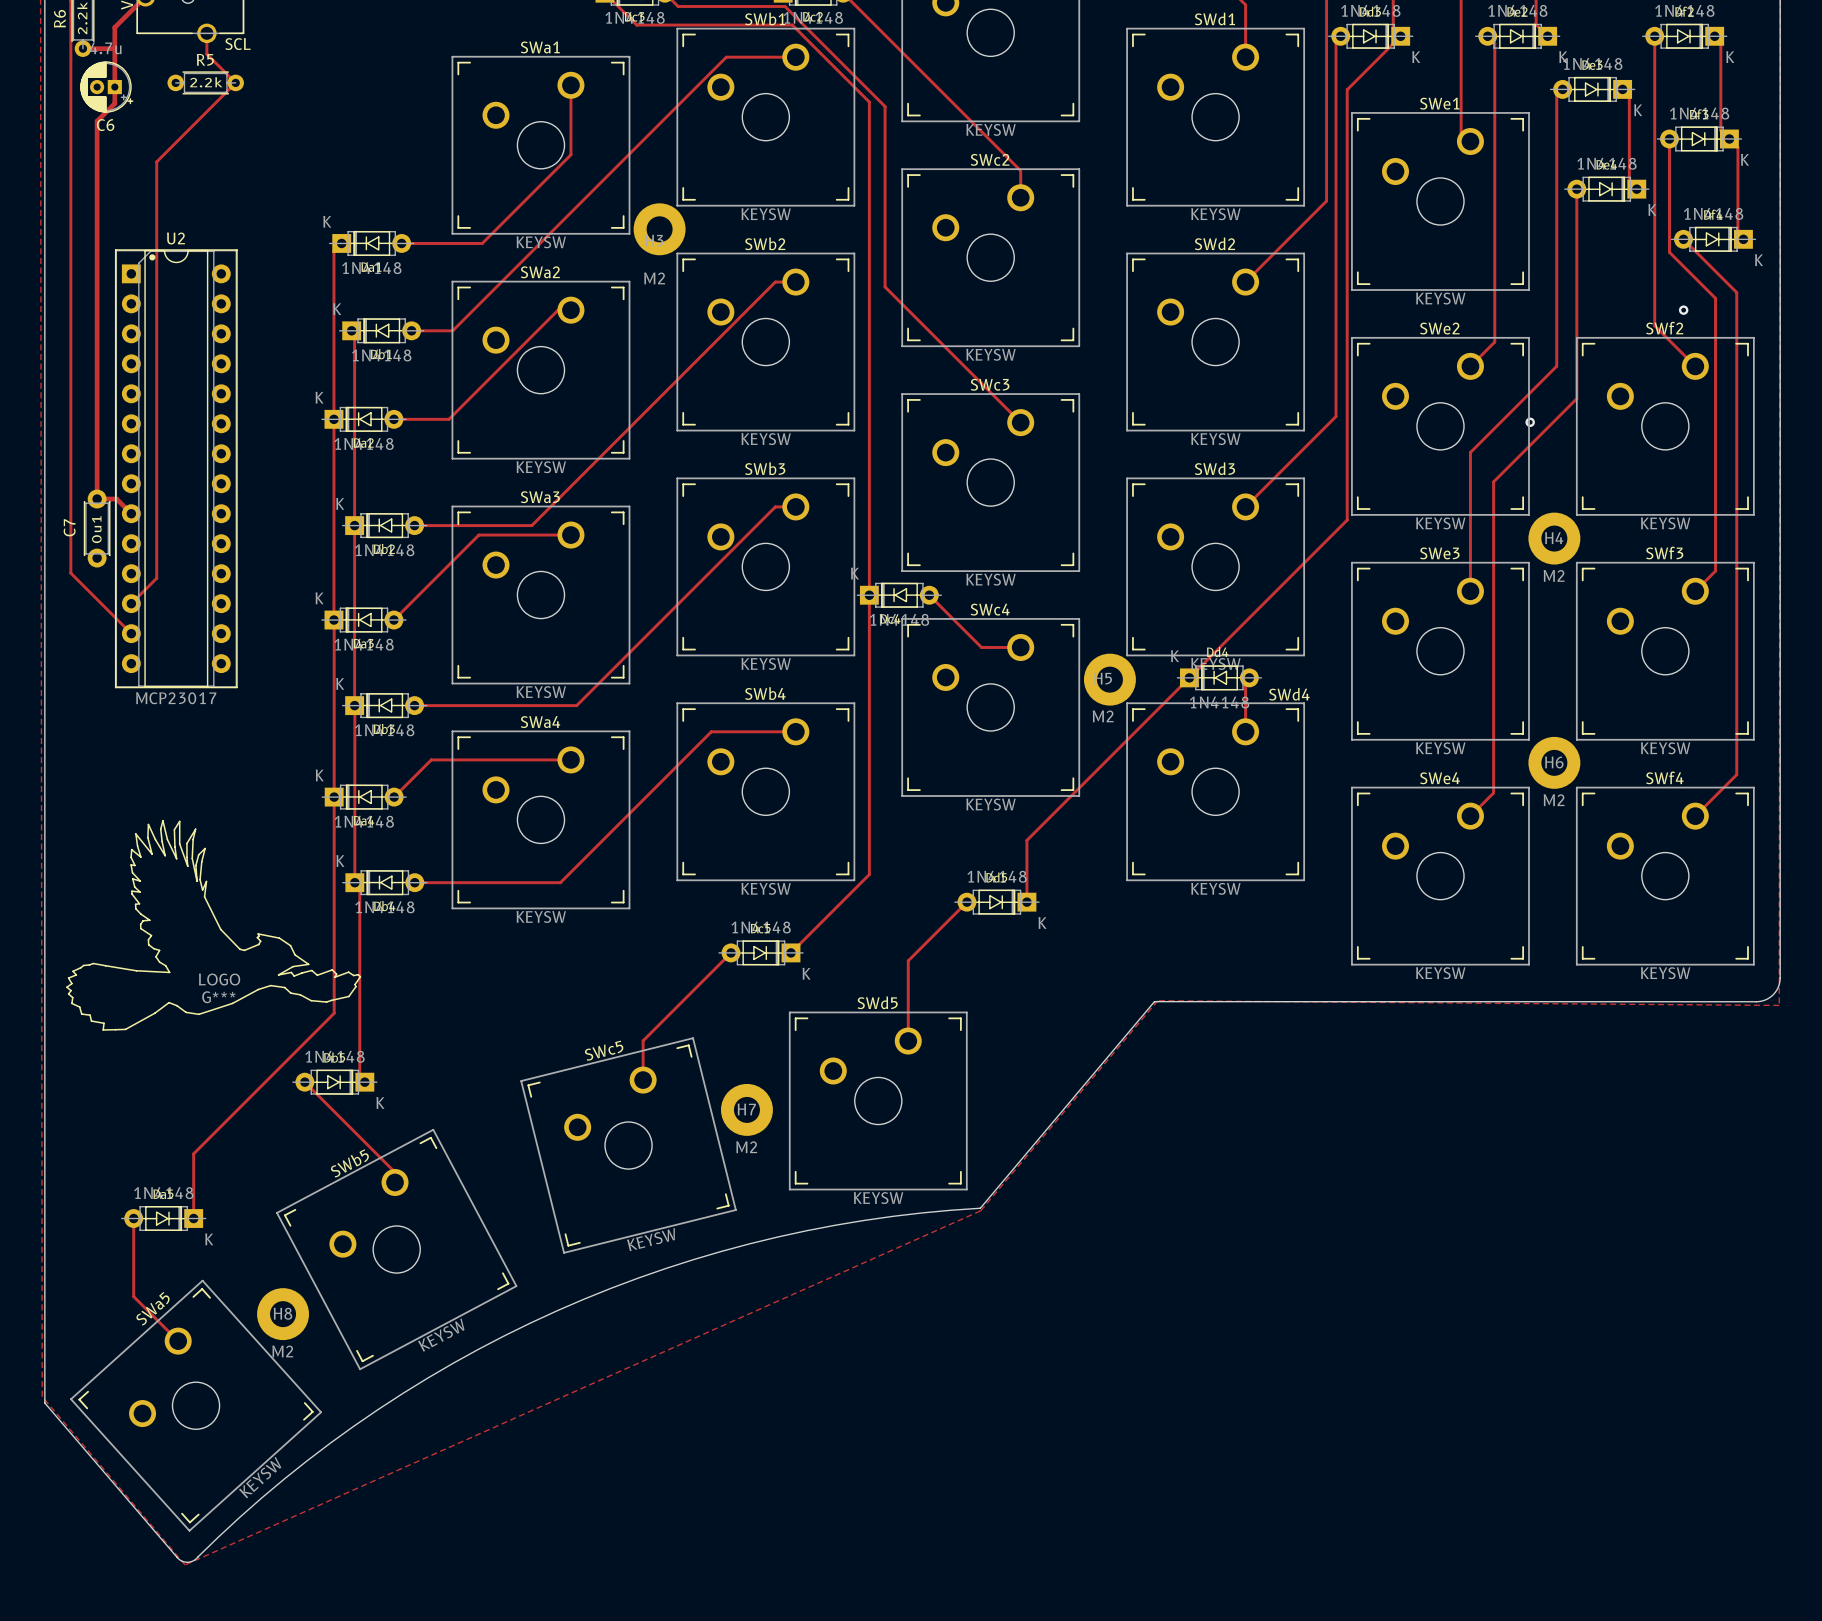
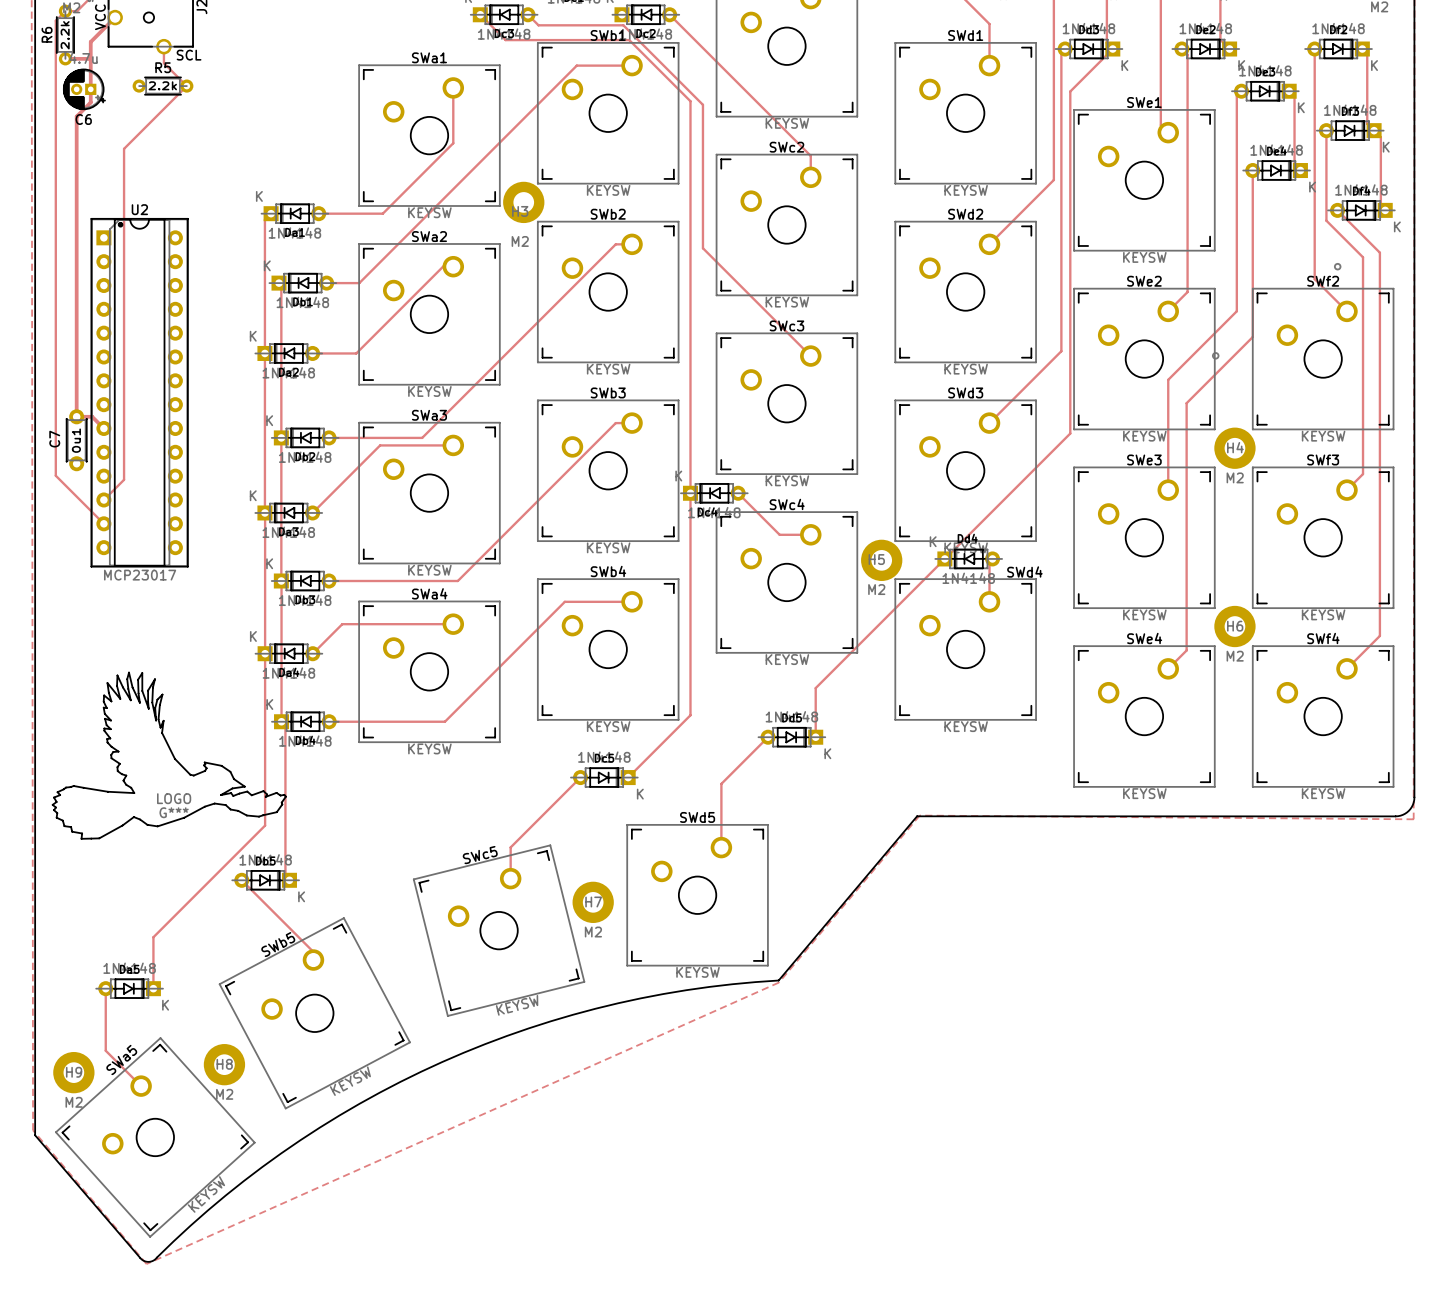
H9: none -> M2 (73, 1072)

